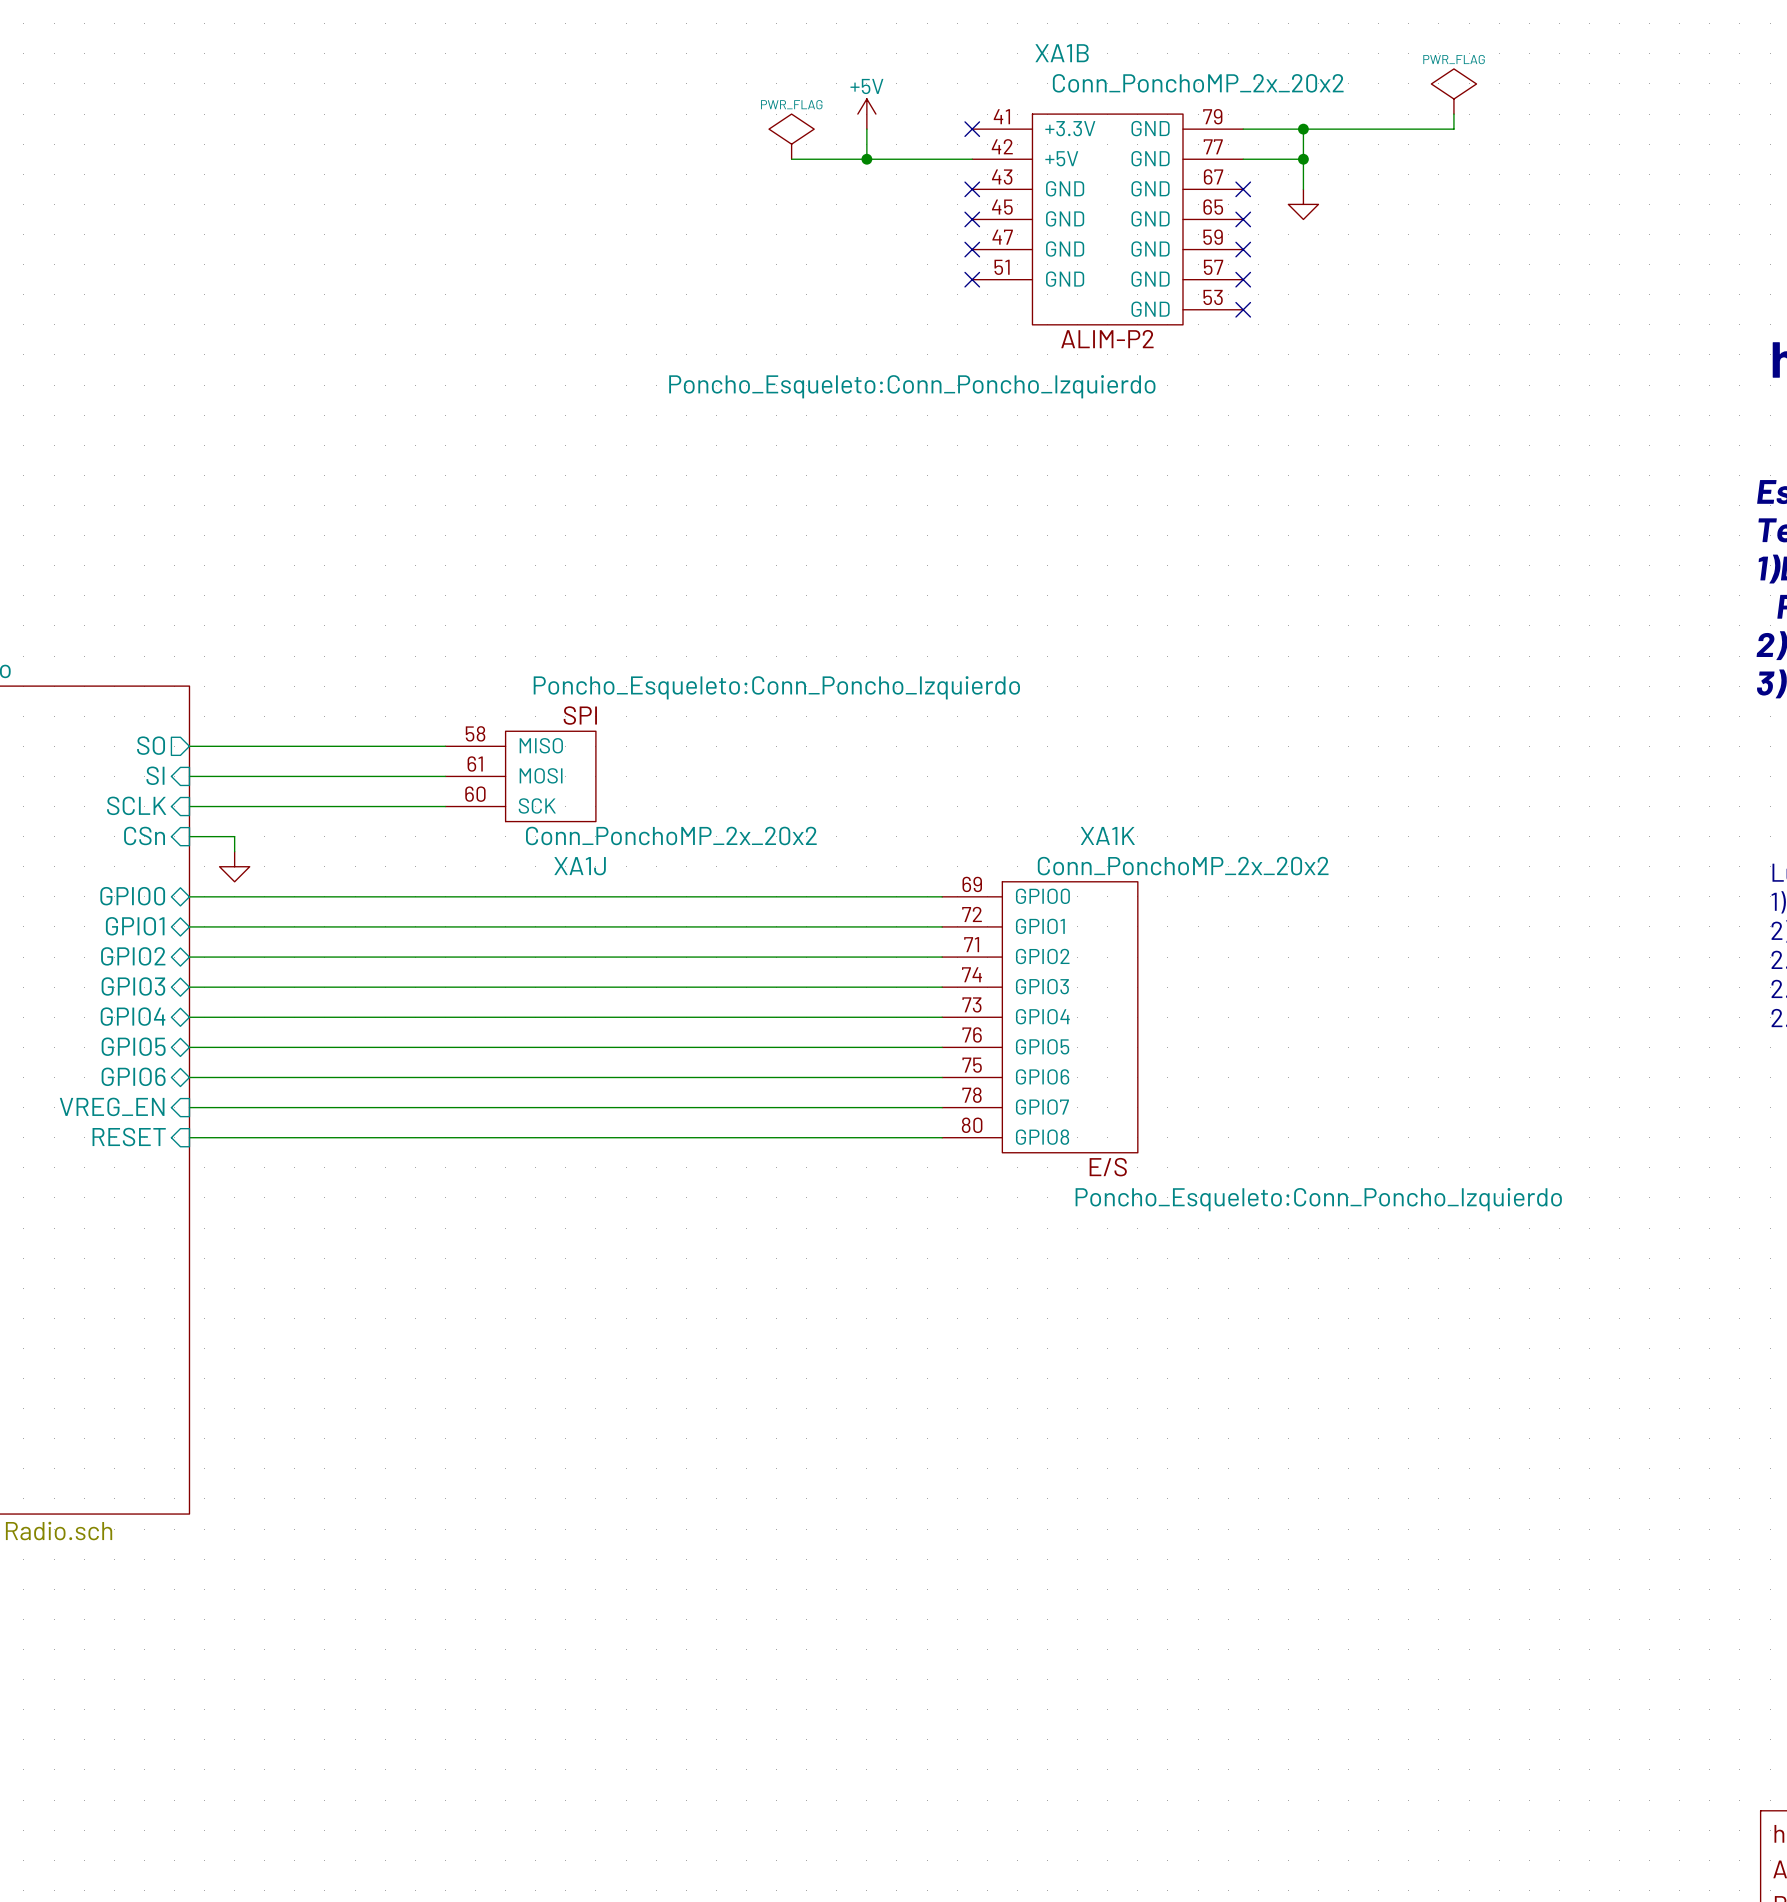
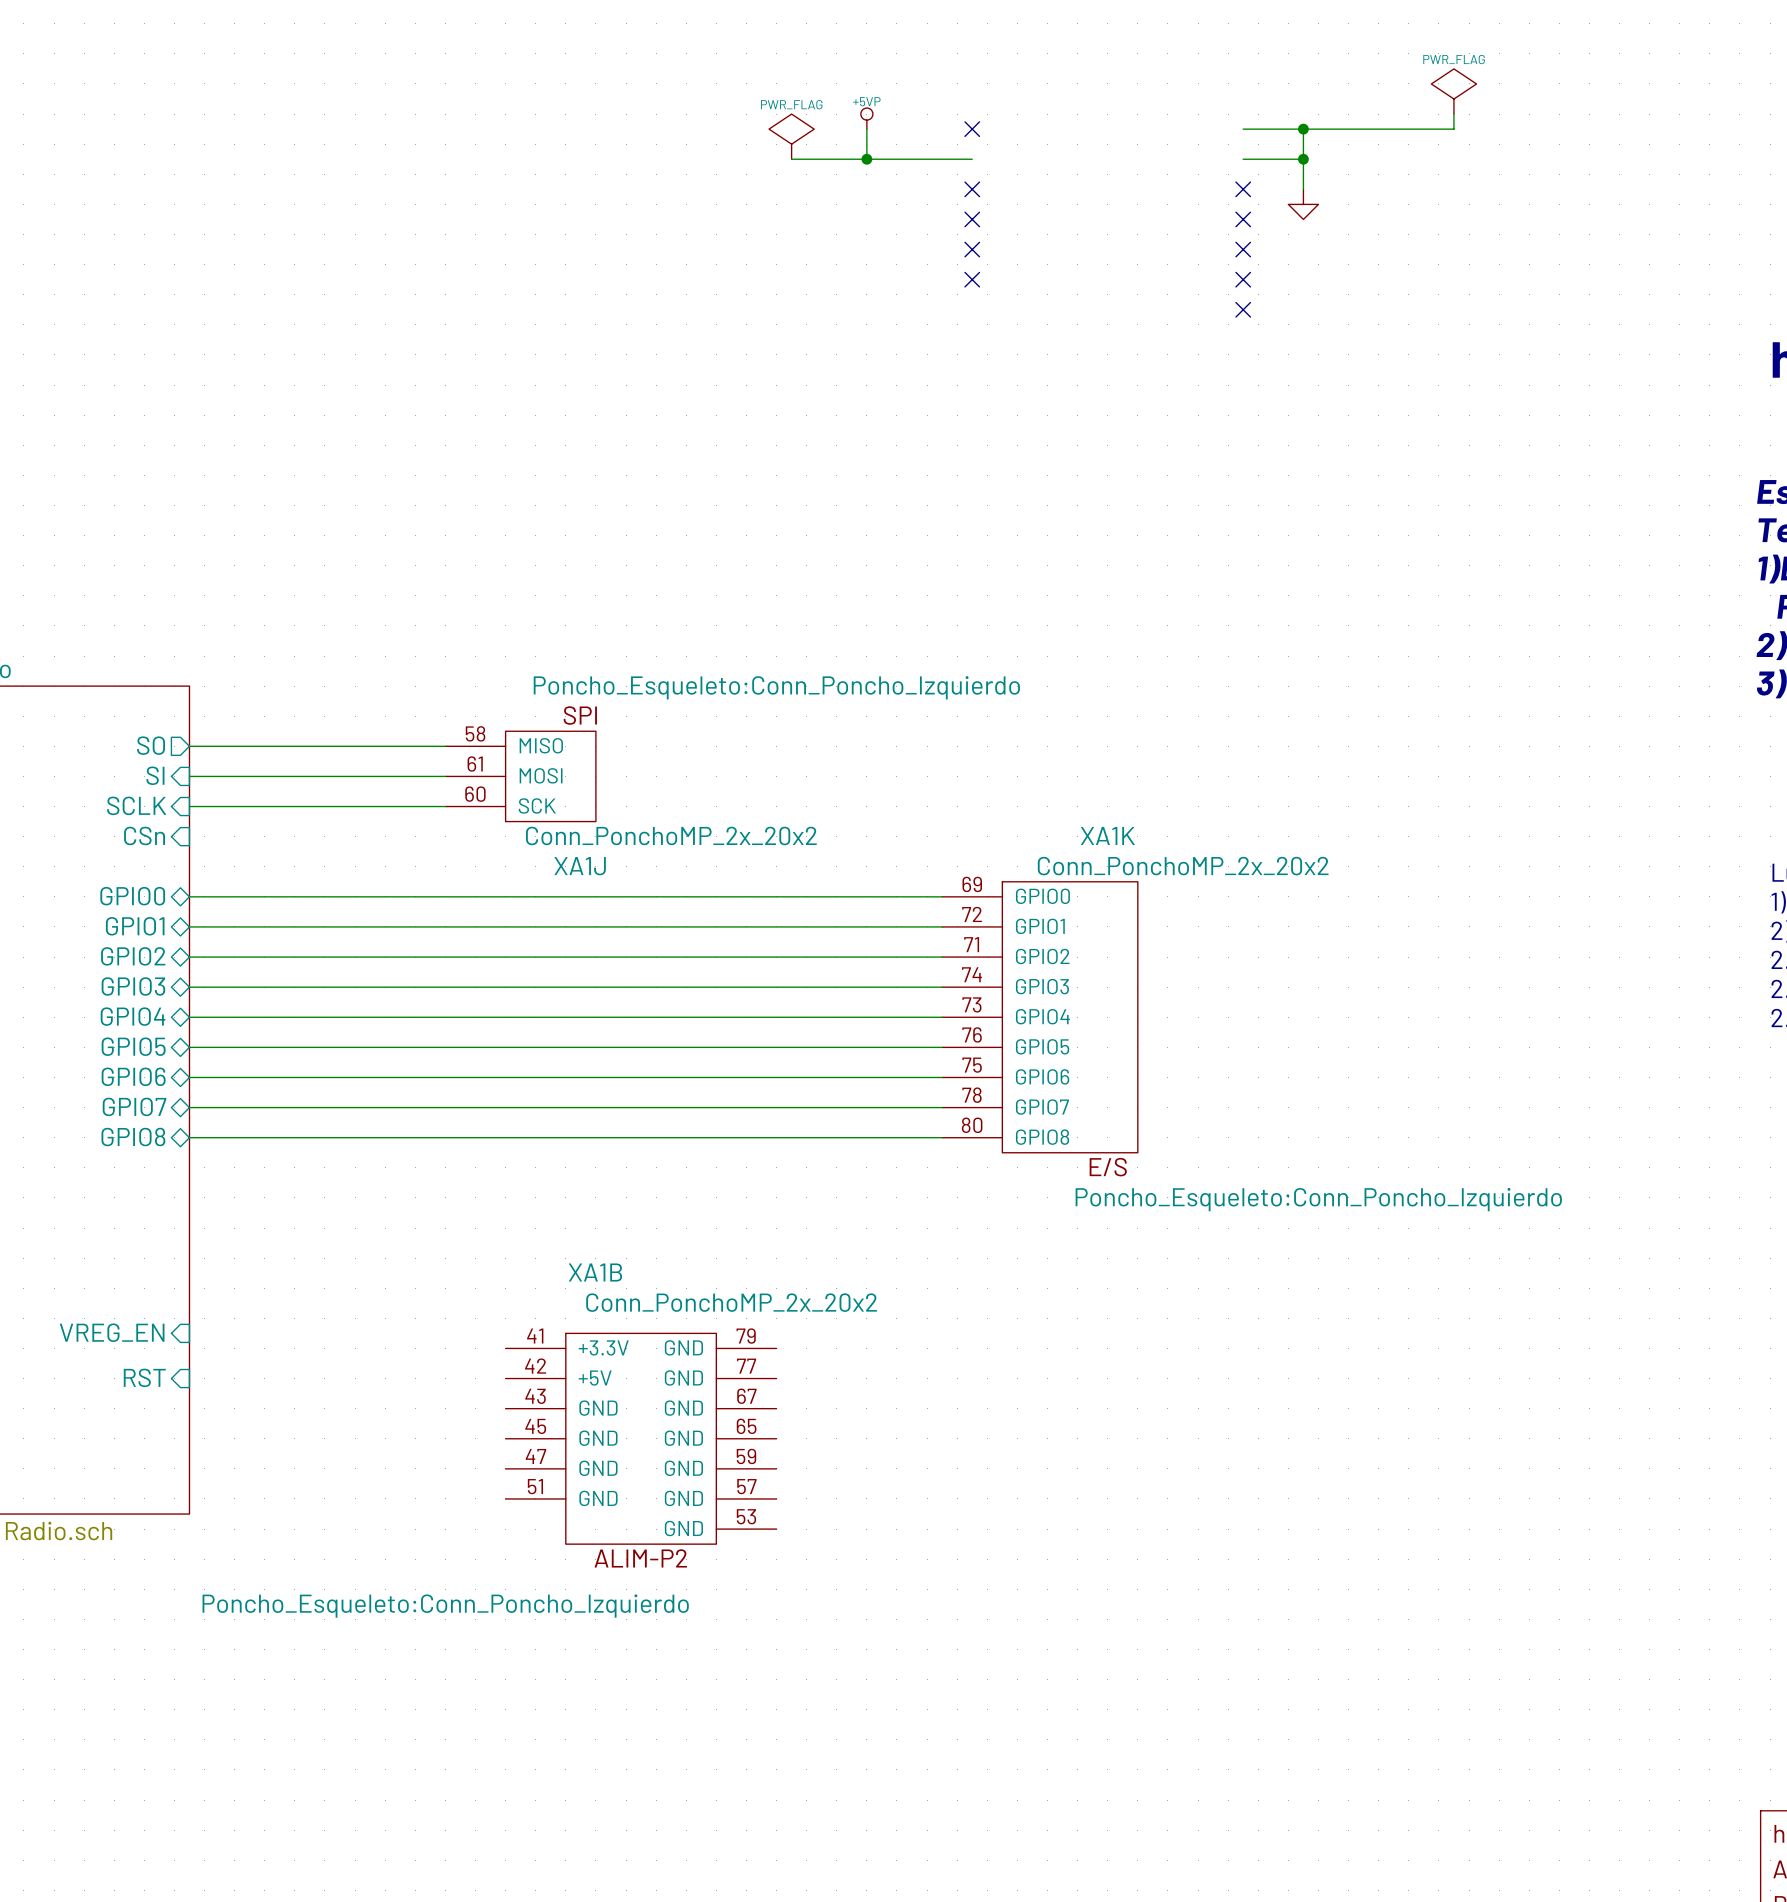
power symbol: +5V (866, 114) -> +5VP (866, 118)
XA1B position: (1107, 219) -> (641, 1438)
wire: (189, 836) (234, 836) (234, 851) -> none
power symbol: (234, 866) -> none
sheet pin shape: input (112, 1106) -> bidirectional (134, 1106)
sheet pin: VREG_EN (112, 1106) -> GPIO7 (134, 1106)
sheet pin shape: input (129, 1137) -> bidirectional (133, 1137)
sheet pin: RESET (129, 1137) -> GPIO8 (133, 1137)
sheet pin: none -> VREG_EN (112, 1332)
sheet pin: none -> RST (144, 1377)

